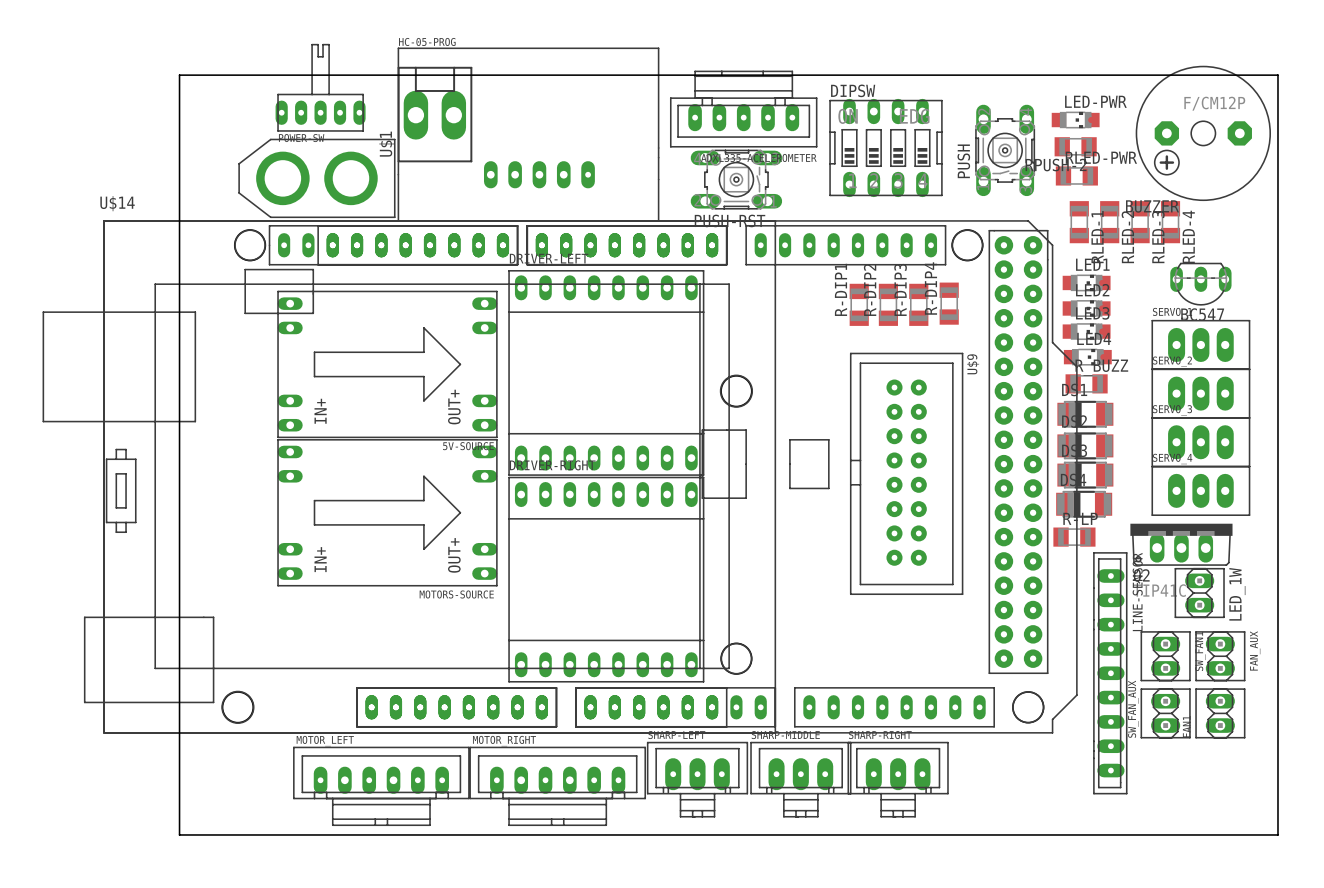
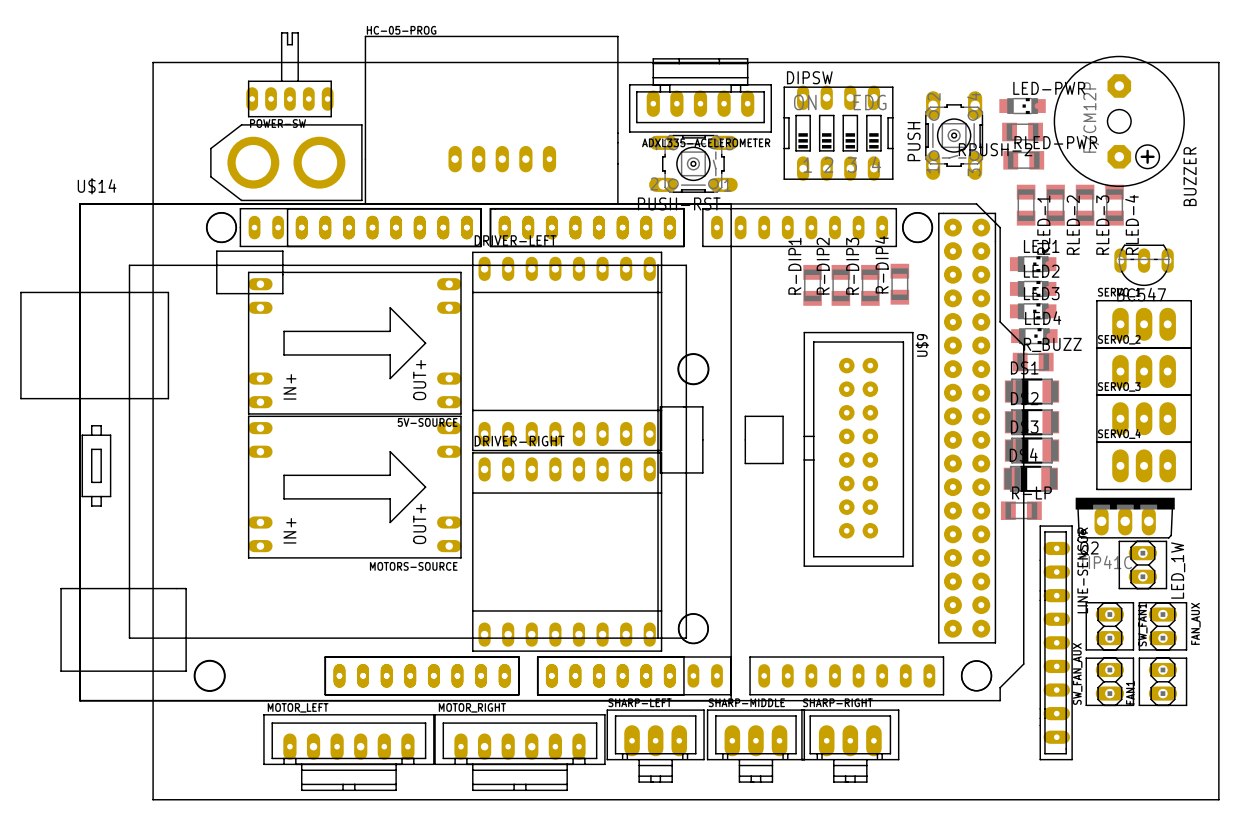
U$1: (434, 114) -> none
BUZZER rotation: 0° (1203, 133) -> 90° counterclockwise (1119, 121)

